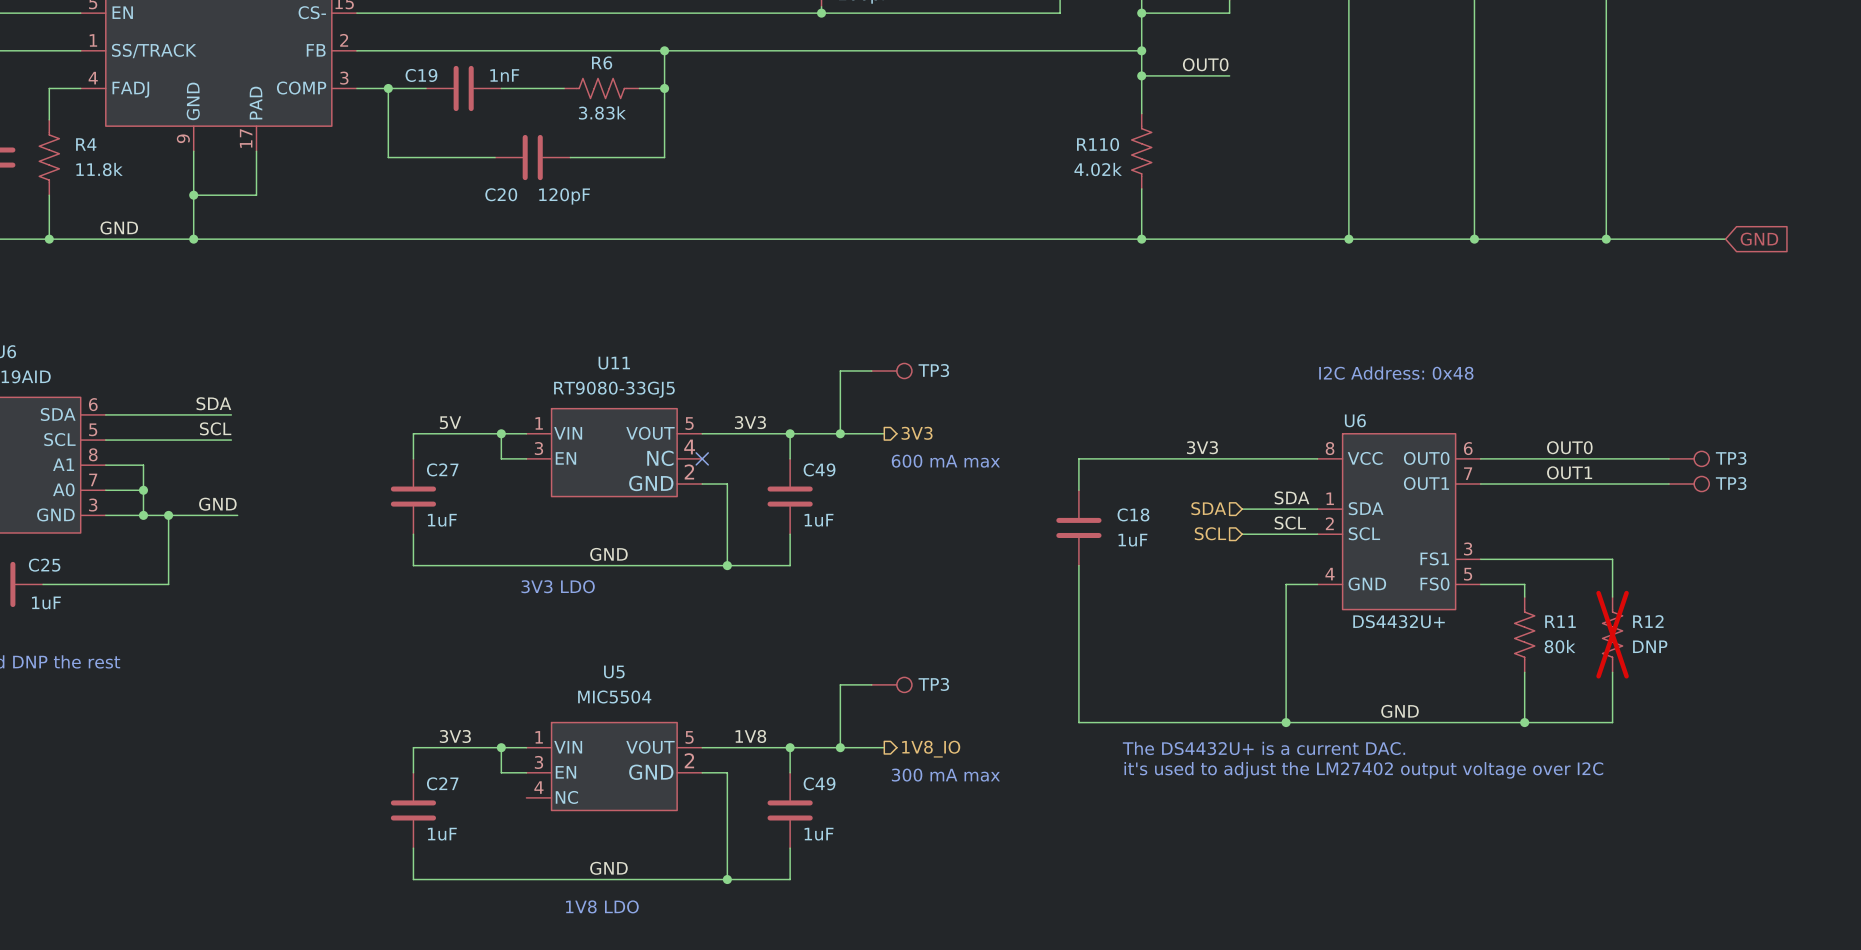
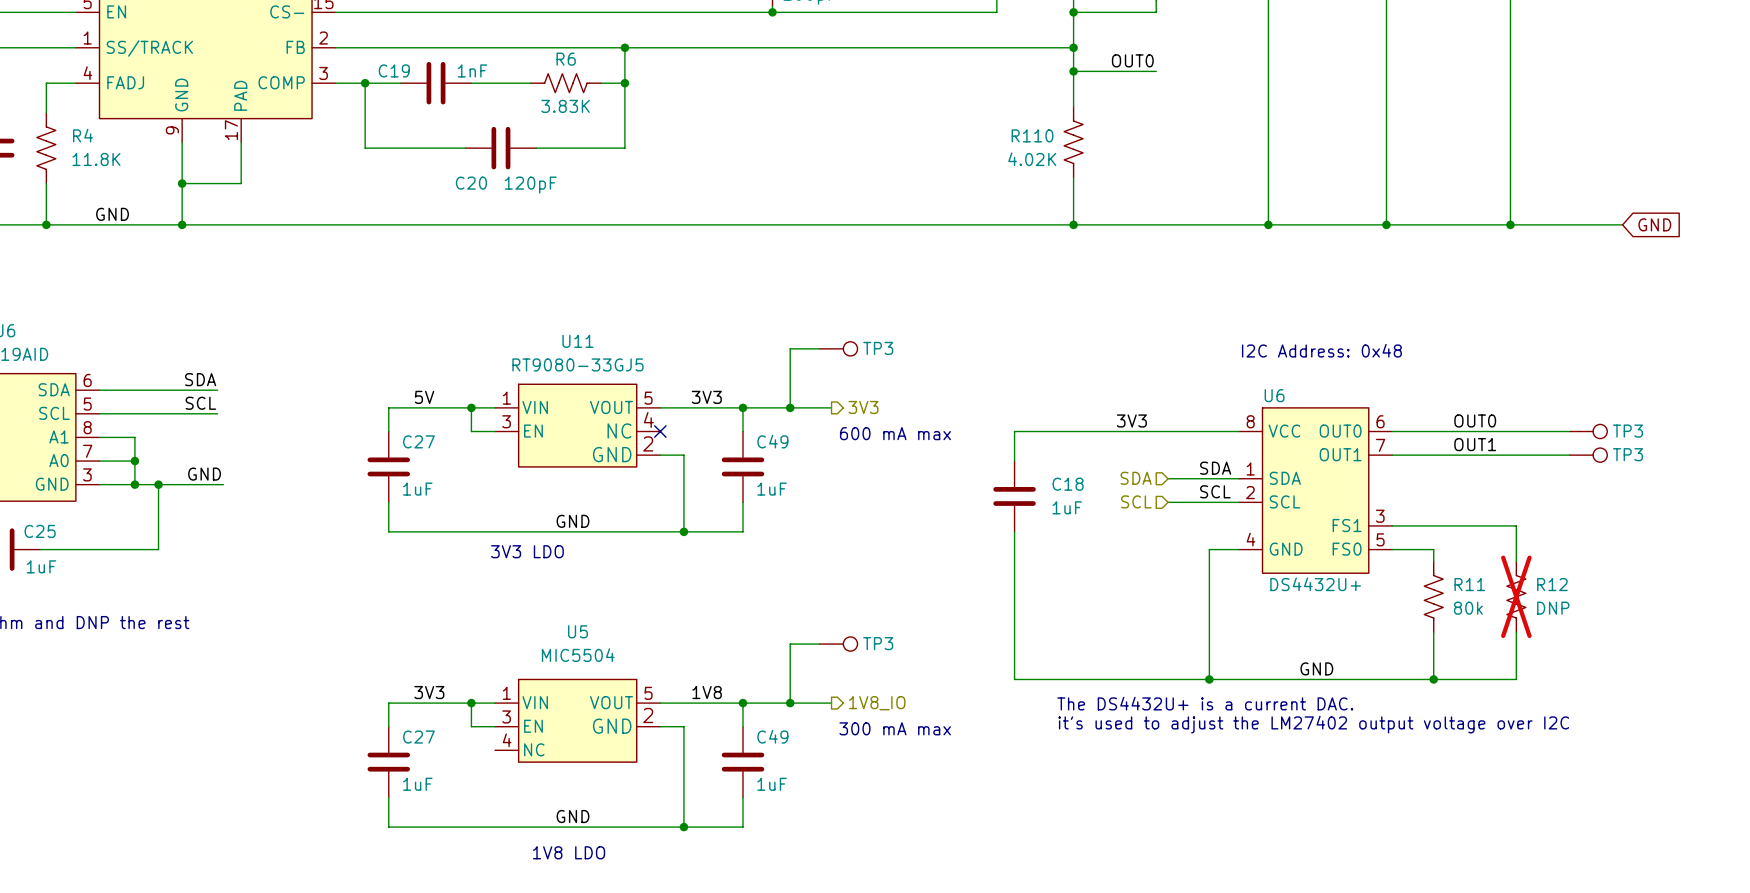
R6 value: 3.83k (602, 112) -> 3.83K (565, 106)
R4 value: 11.8k (99, 169) -> 11.8K (96, 159)
R110 value: 4.02k (1098, 169) -> 4.02K (1032, 159)

